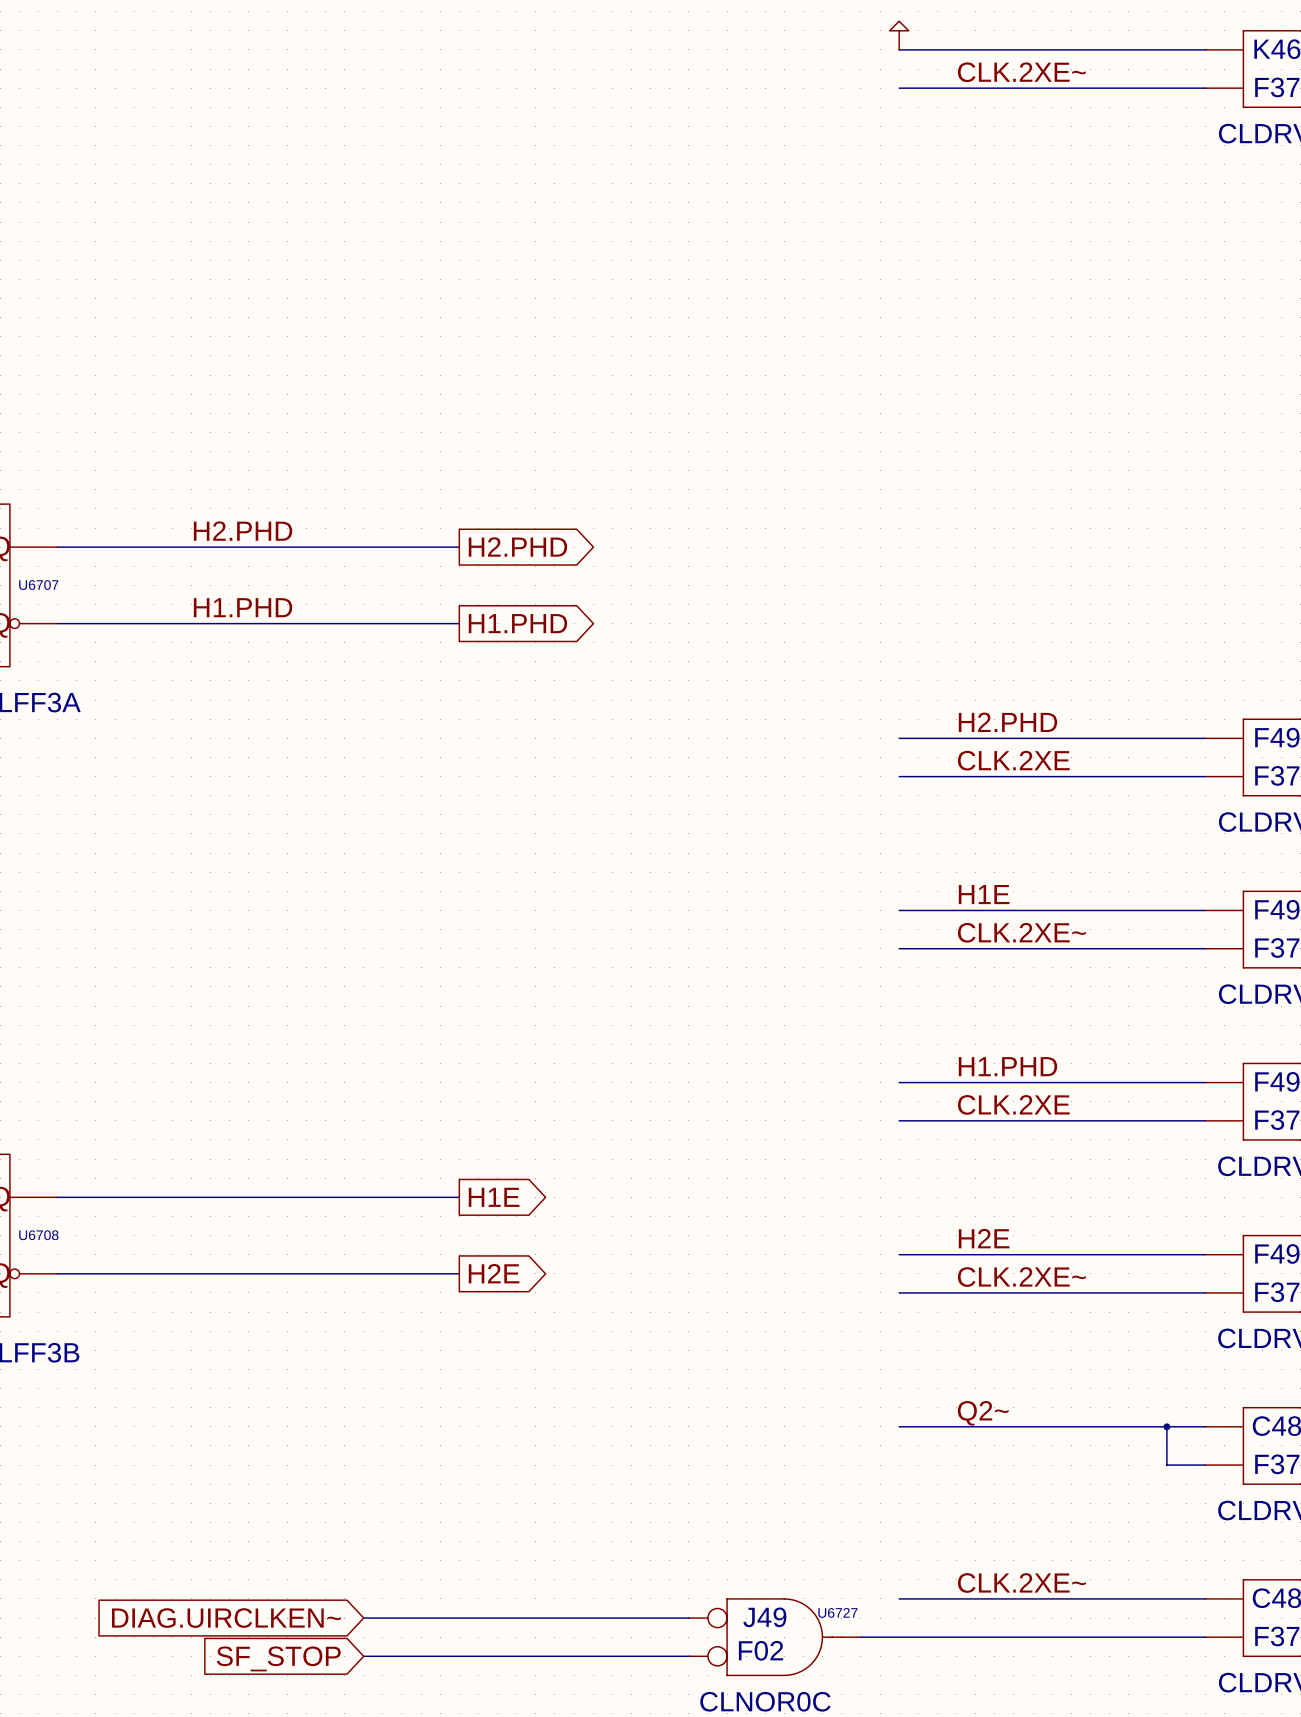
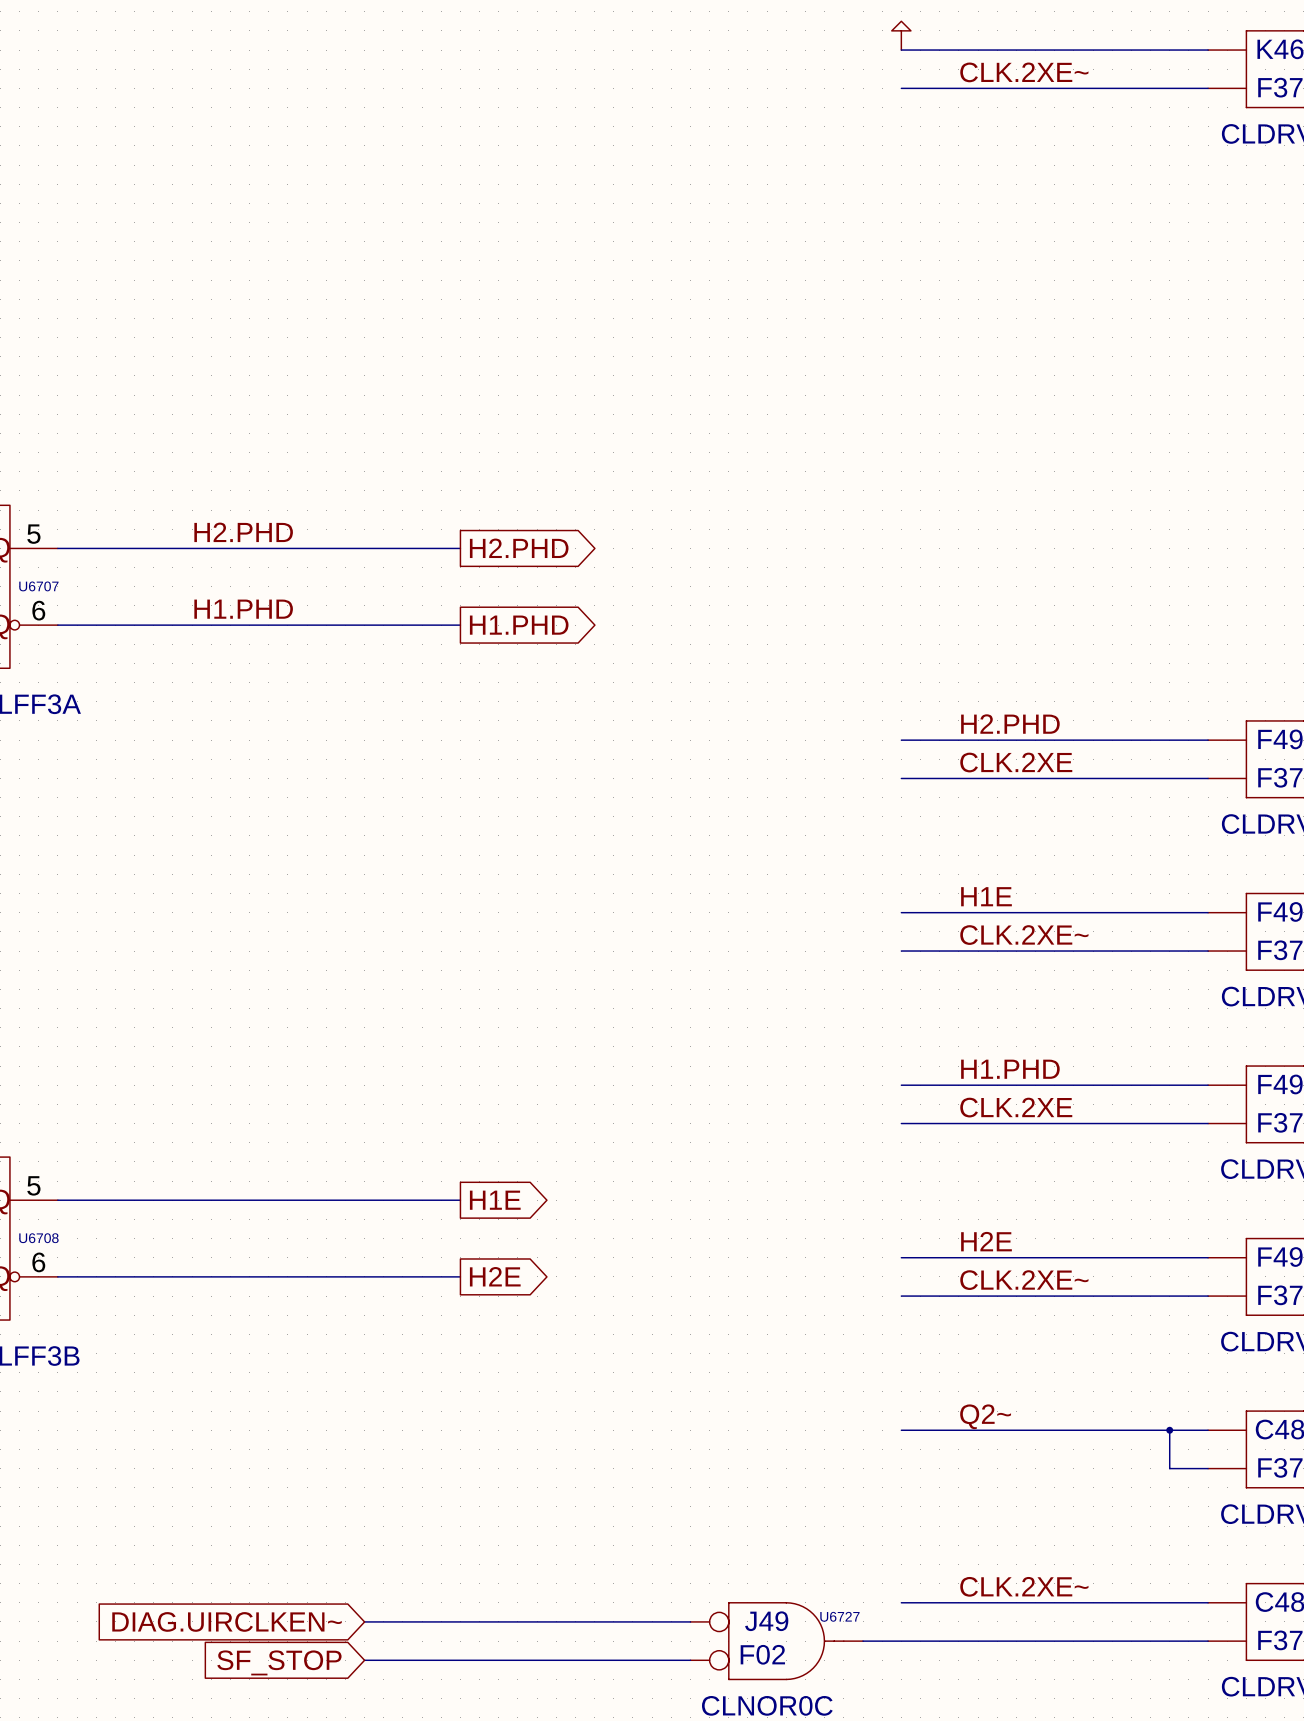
U6707 pin number: none -> 5 (33, 534)
U6707 pin number: none -> 6 (38, 610)
U6708 pin number: none -> 5 (33, 1185)
U6708 pin number: none -> 6 (38, 1262)

